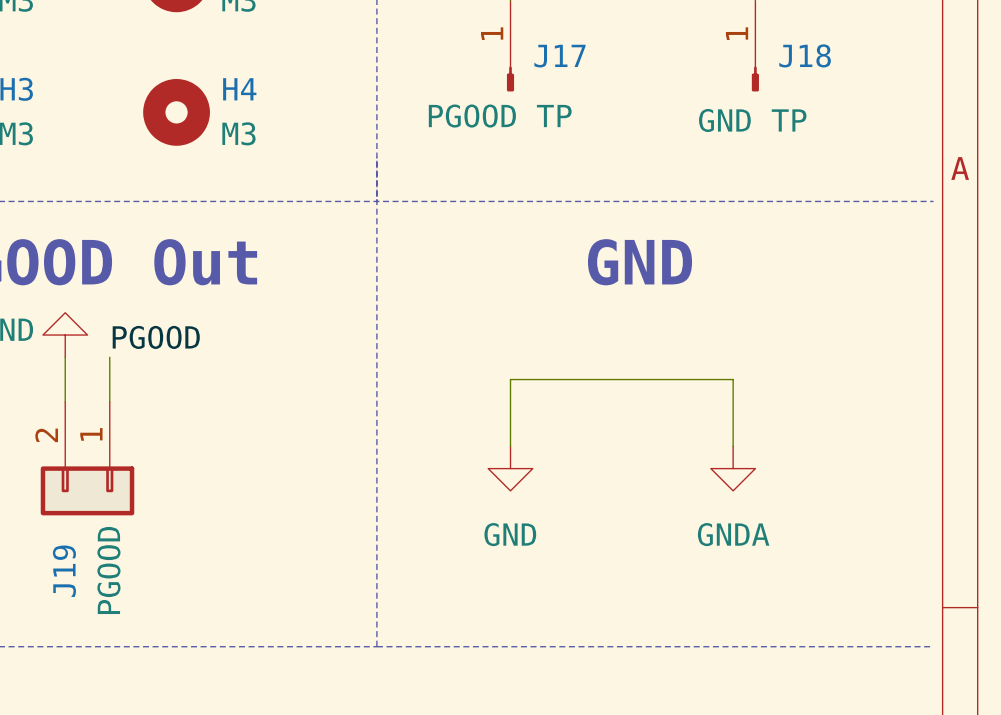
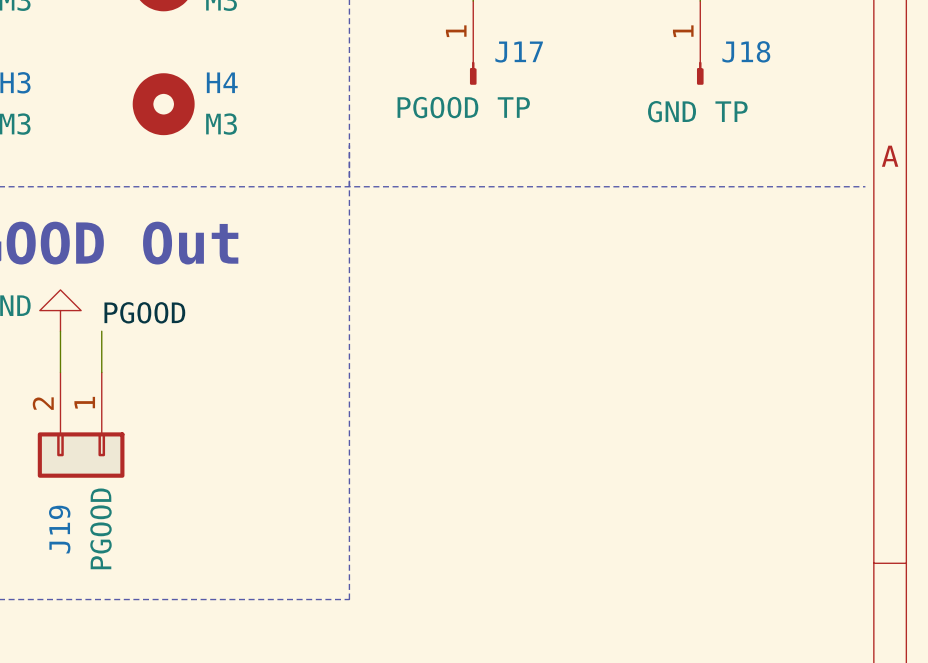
text: GND (640, 262) -> none
wire: (510, 446) (510, 379) (733, 379) (733, 446) -> none
power symbol: GND (510, 468) -> none
power symbol: GNDA (733, 468) -> none
line: (376, 646) (933, 646) -> none

